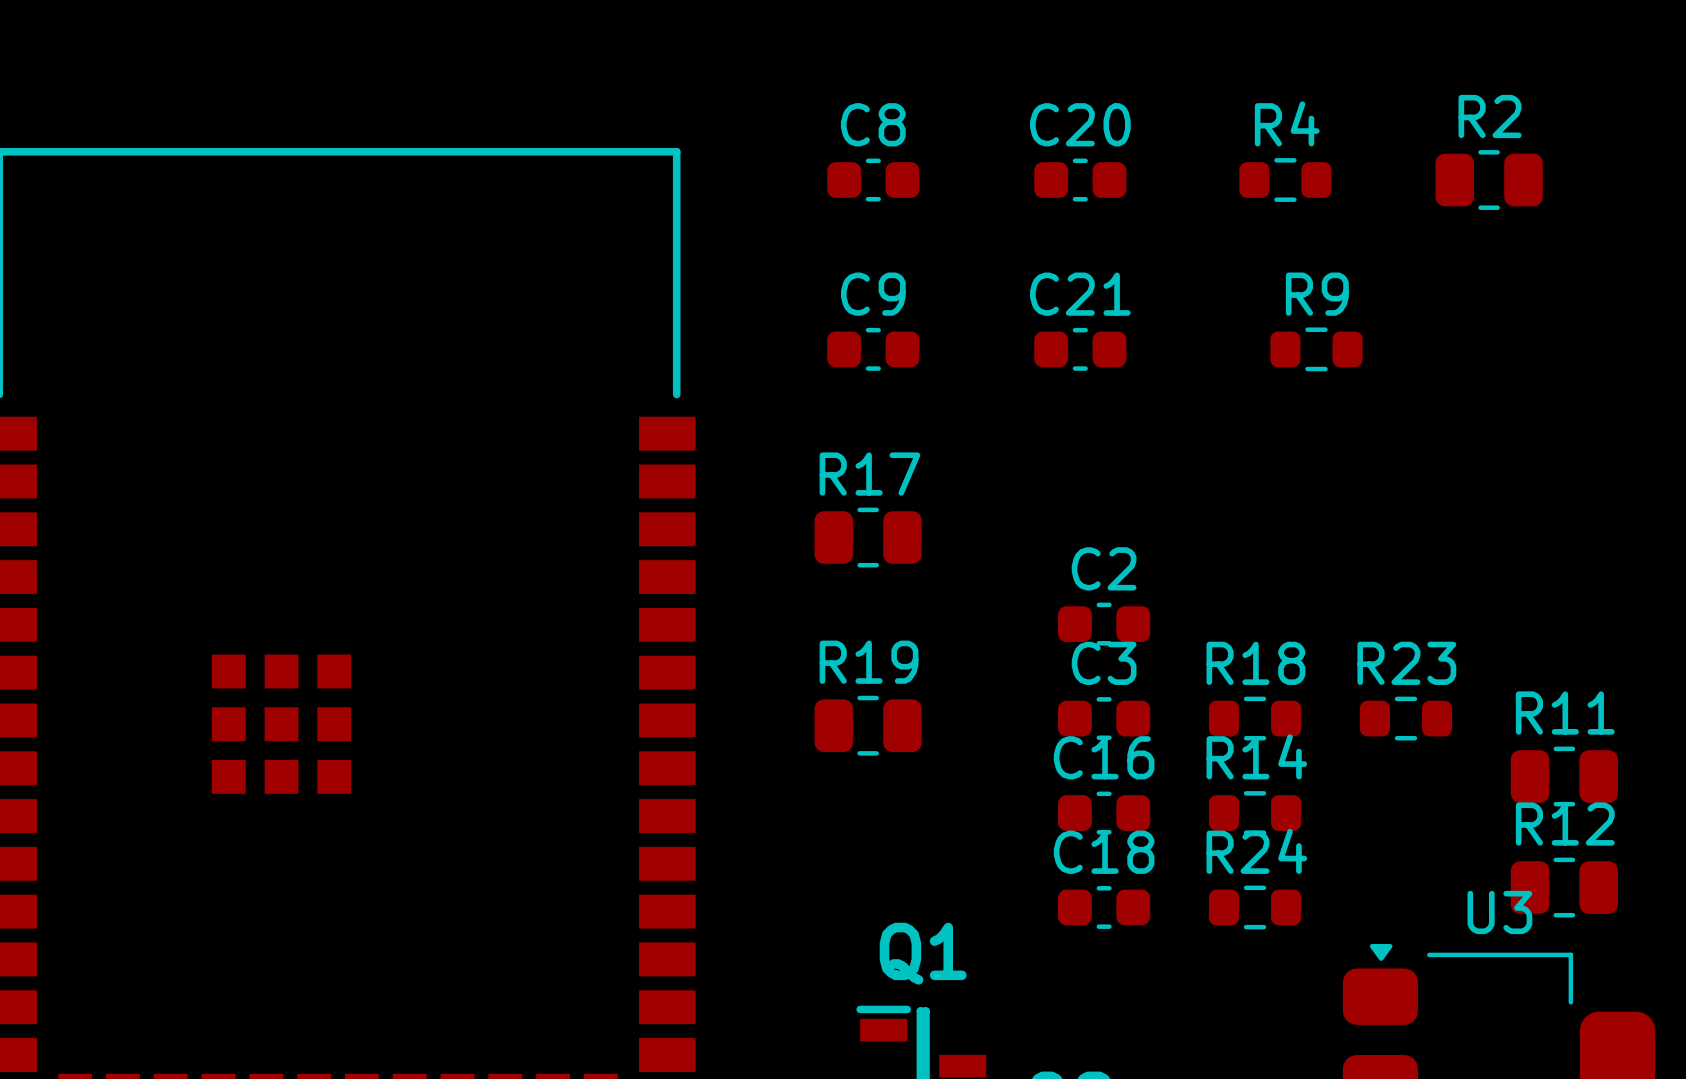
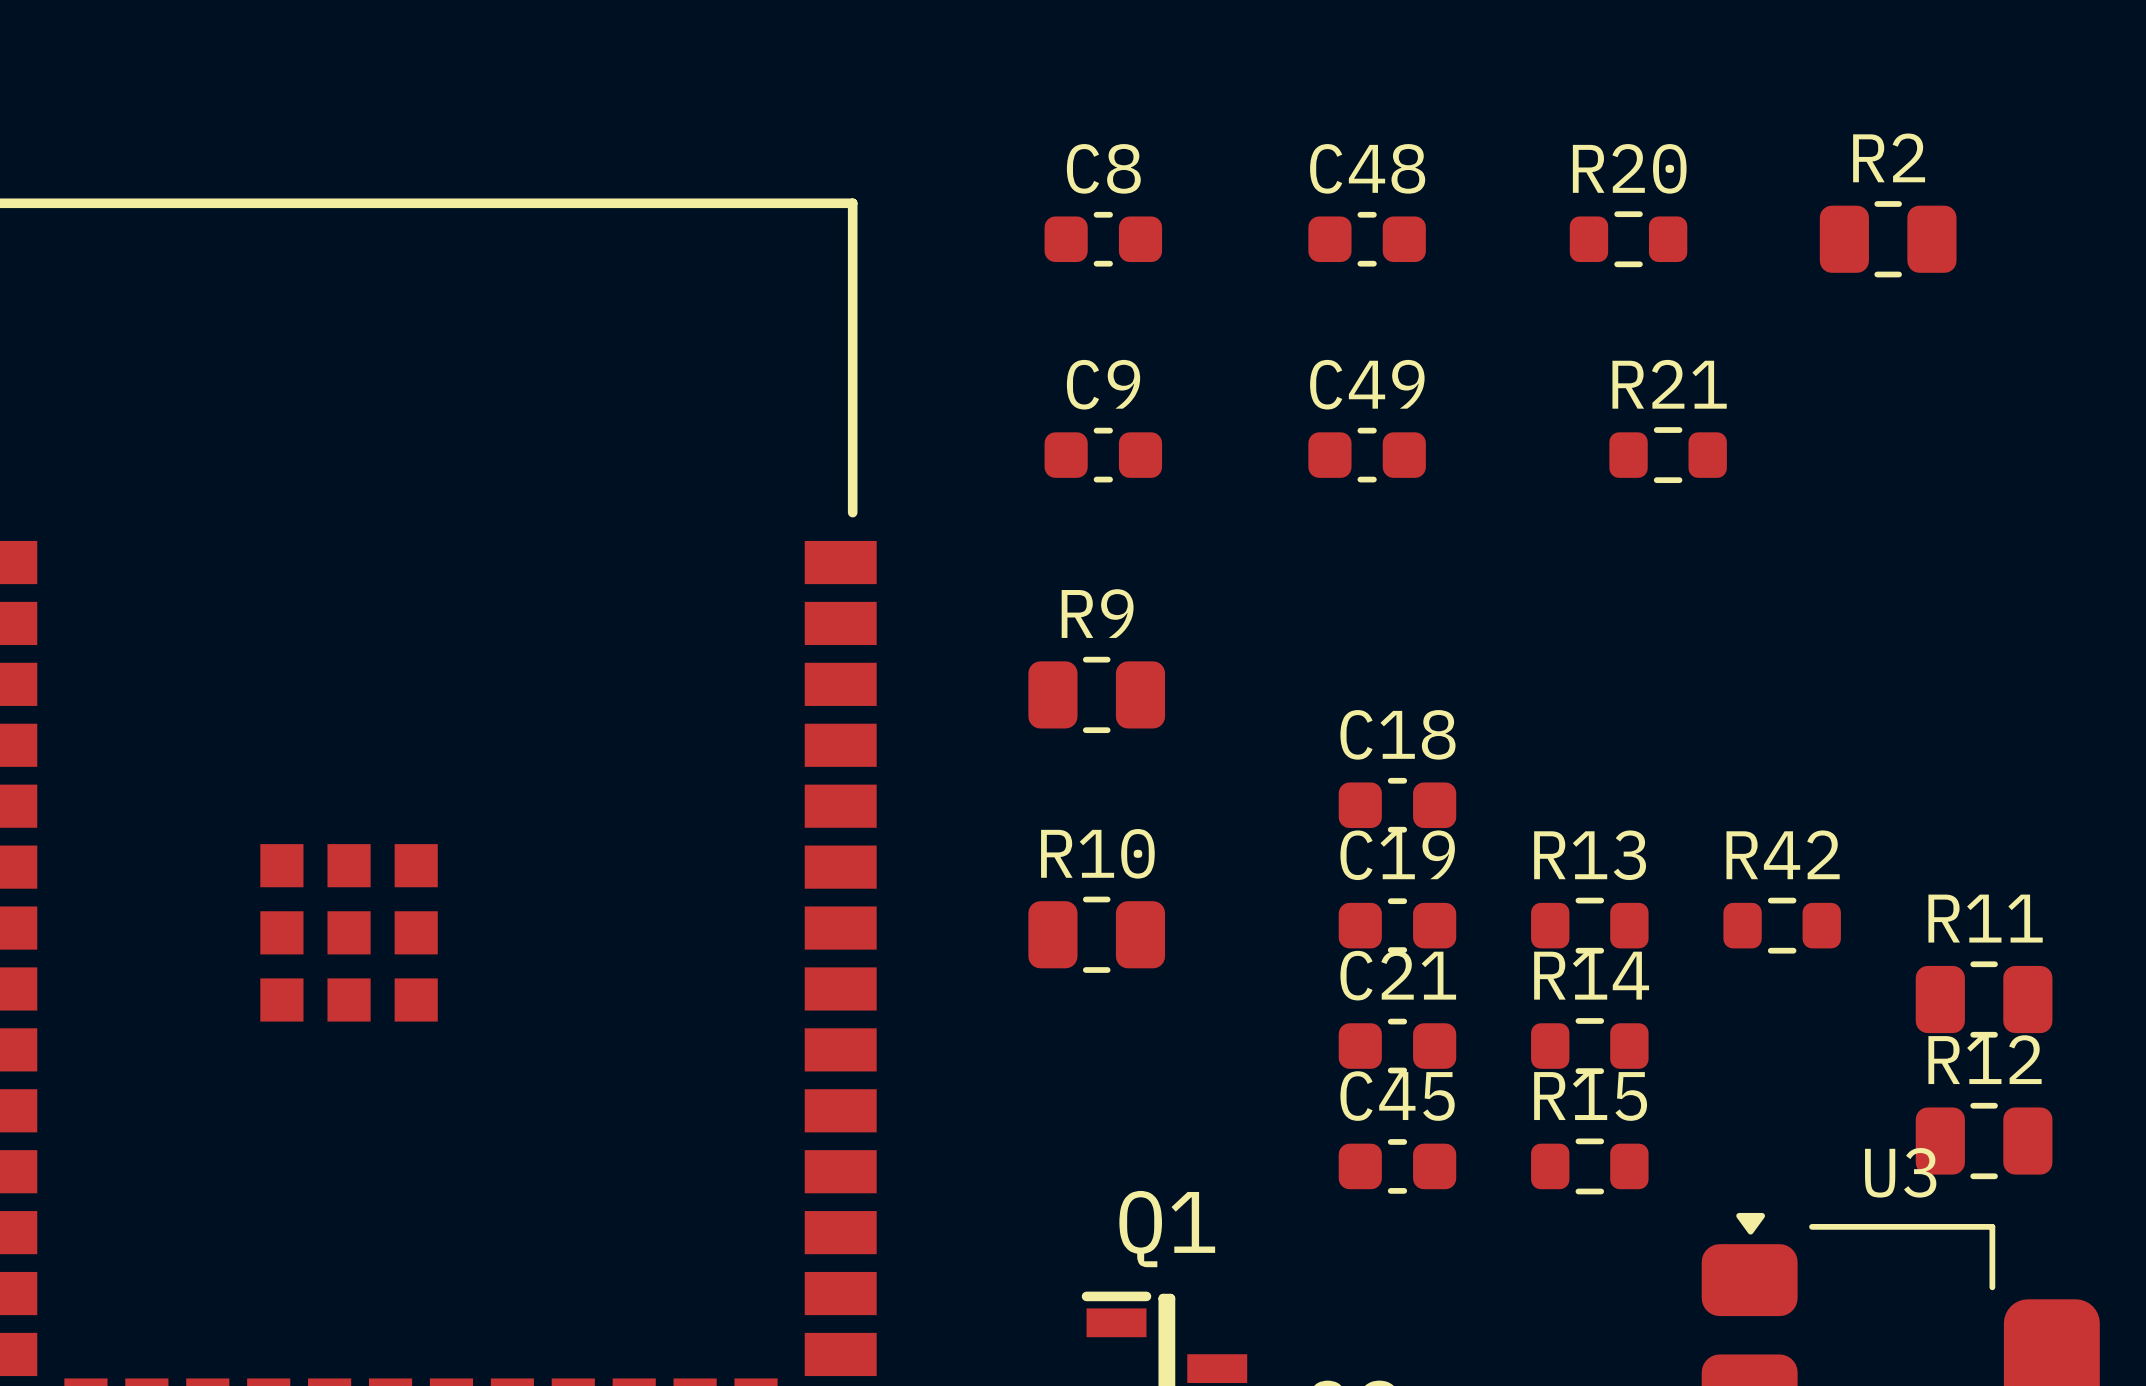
R4 name: R4 (1287, 123) -> R20 (1629, 168)
C20 name: C20 (1080, 124) -> C48 (1367, 168)
C21 name: C21 (1080, 294) -> C49 (1367, 384)
R9 name: R9 (1317, 294) -> R21 (1669, 384)
R17 name: R17 (869, 474) -> R9 (1097, 613)
C2 name: C2 (1104, 568) -> C18 (1397, 734)
R19 name: R19 (869, 662) -> R10 (1097, 853)
C3 name: C3 (1104, 663) -> C19 (1397, 855)
R18 name: R18 (1255, 663) -> R13 (1590, 855)
R23 name: R23 (1406, 663) -> R42 (1783, 854)
C16 name: C16 (1104, 757) -> C21 (1398, 975)
R24 name: R24 (1256, 851) -> R15 (1590, 1096)
C18 name: C18 (1104, 852) -> C45 (1397, 1096)

